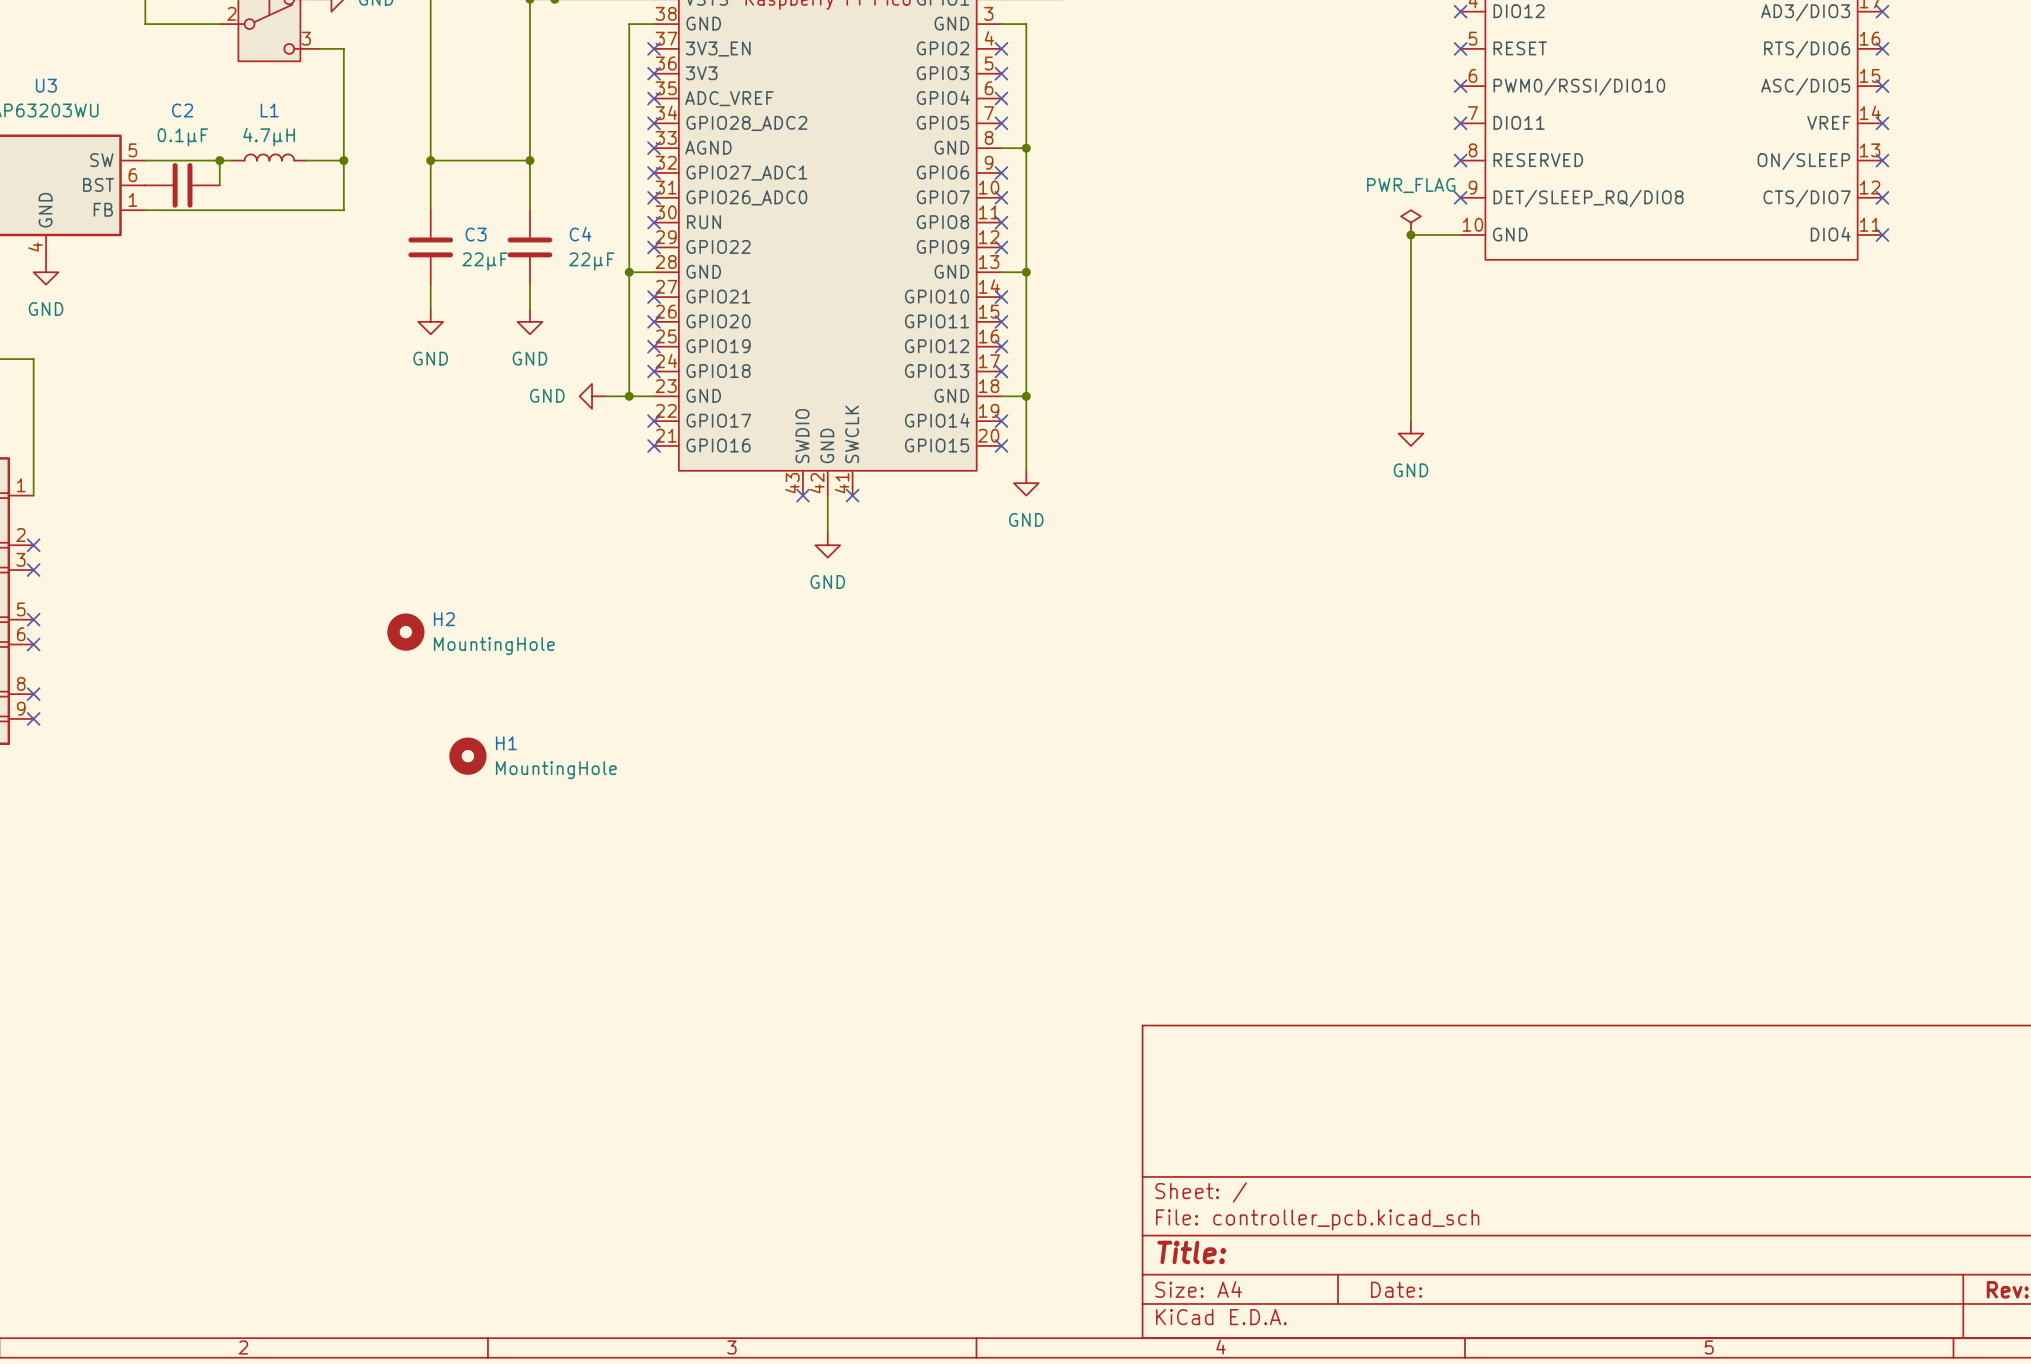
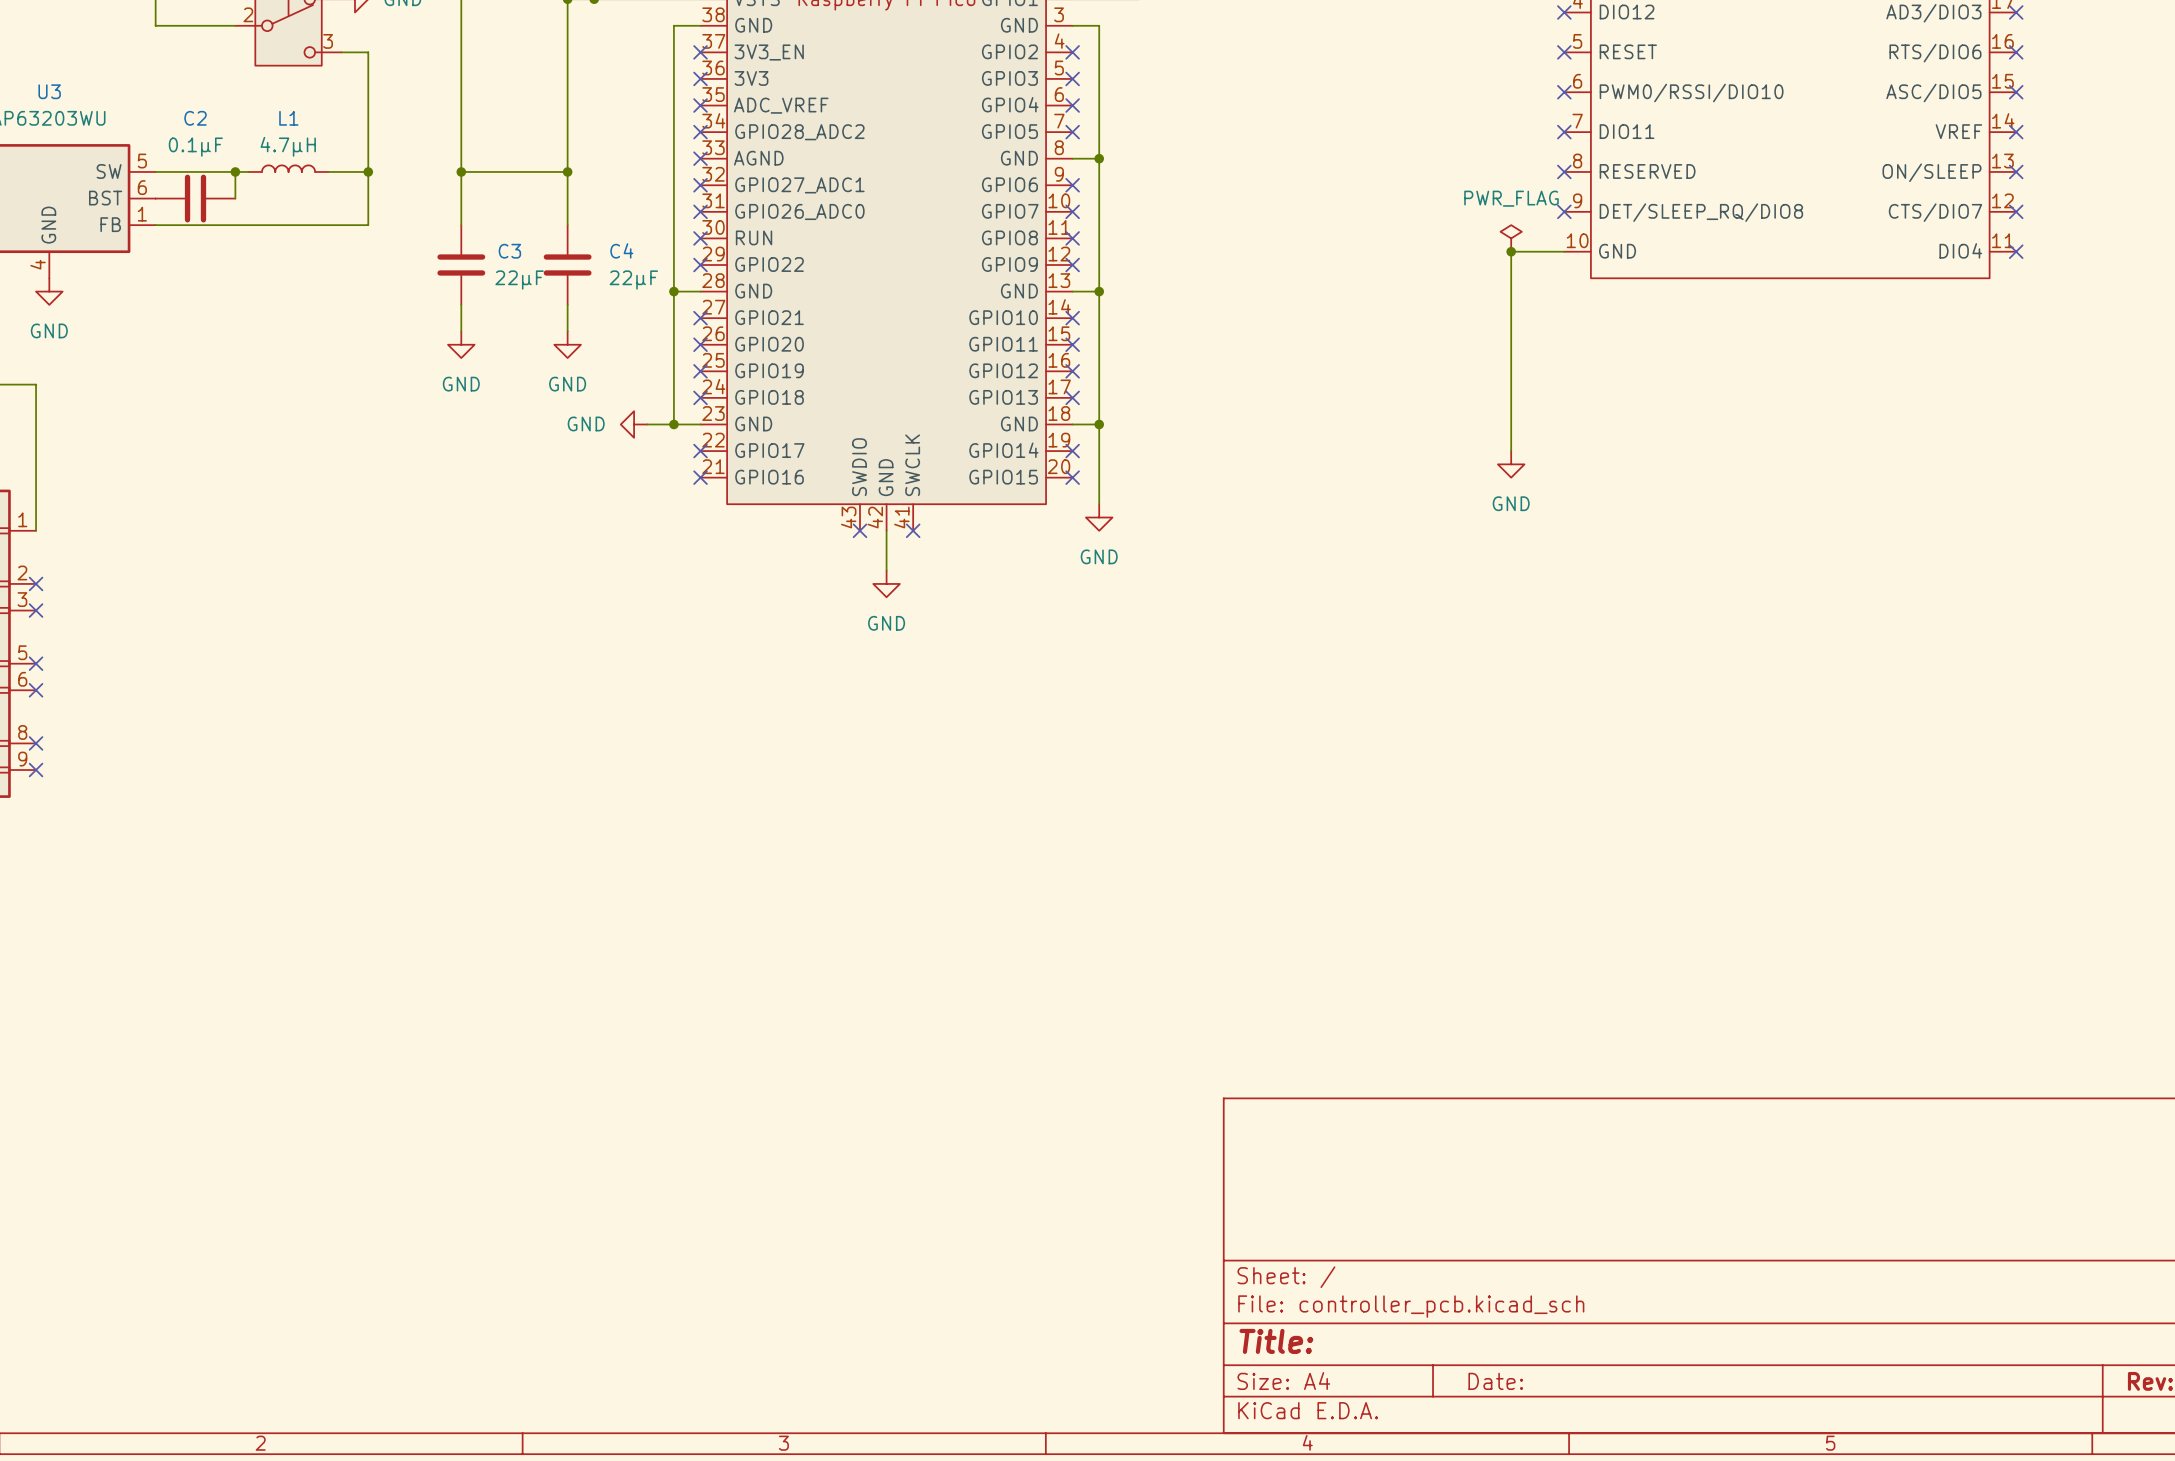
H2: MountingHole (405, 632) -> none
H1: MountingHole (467, 756) -> none

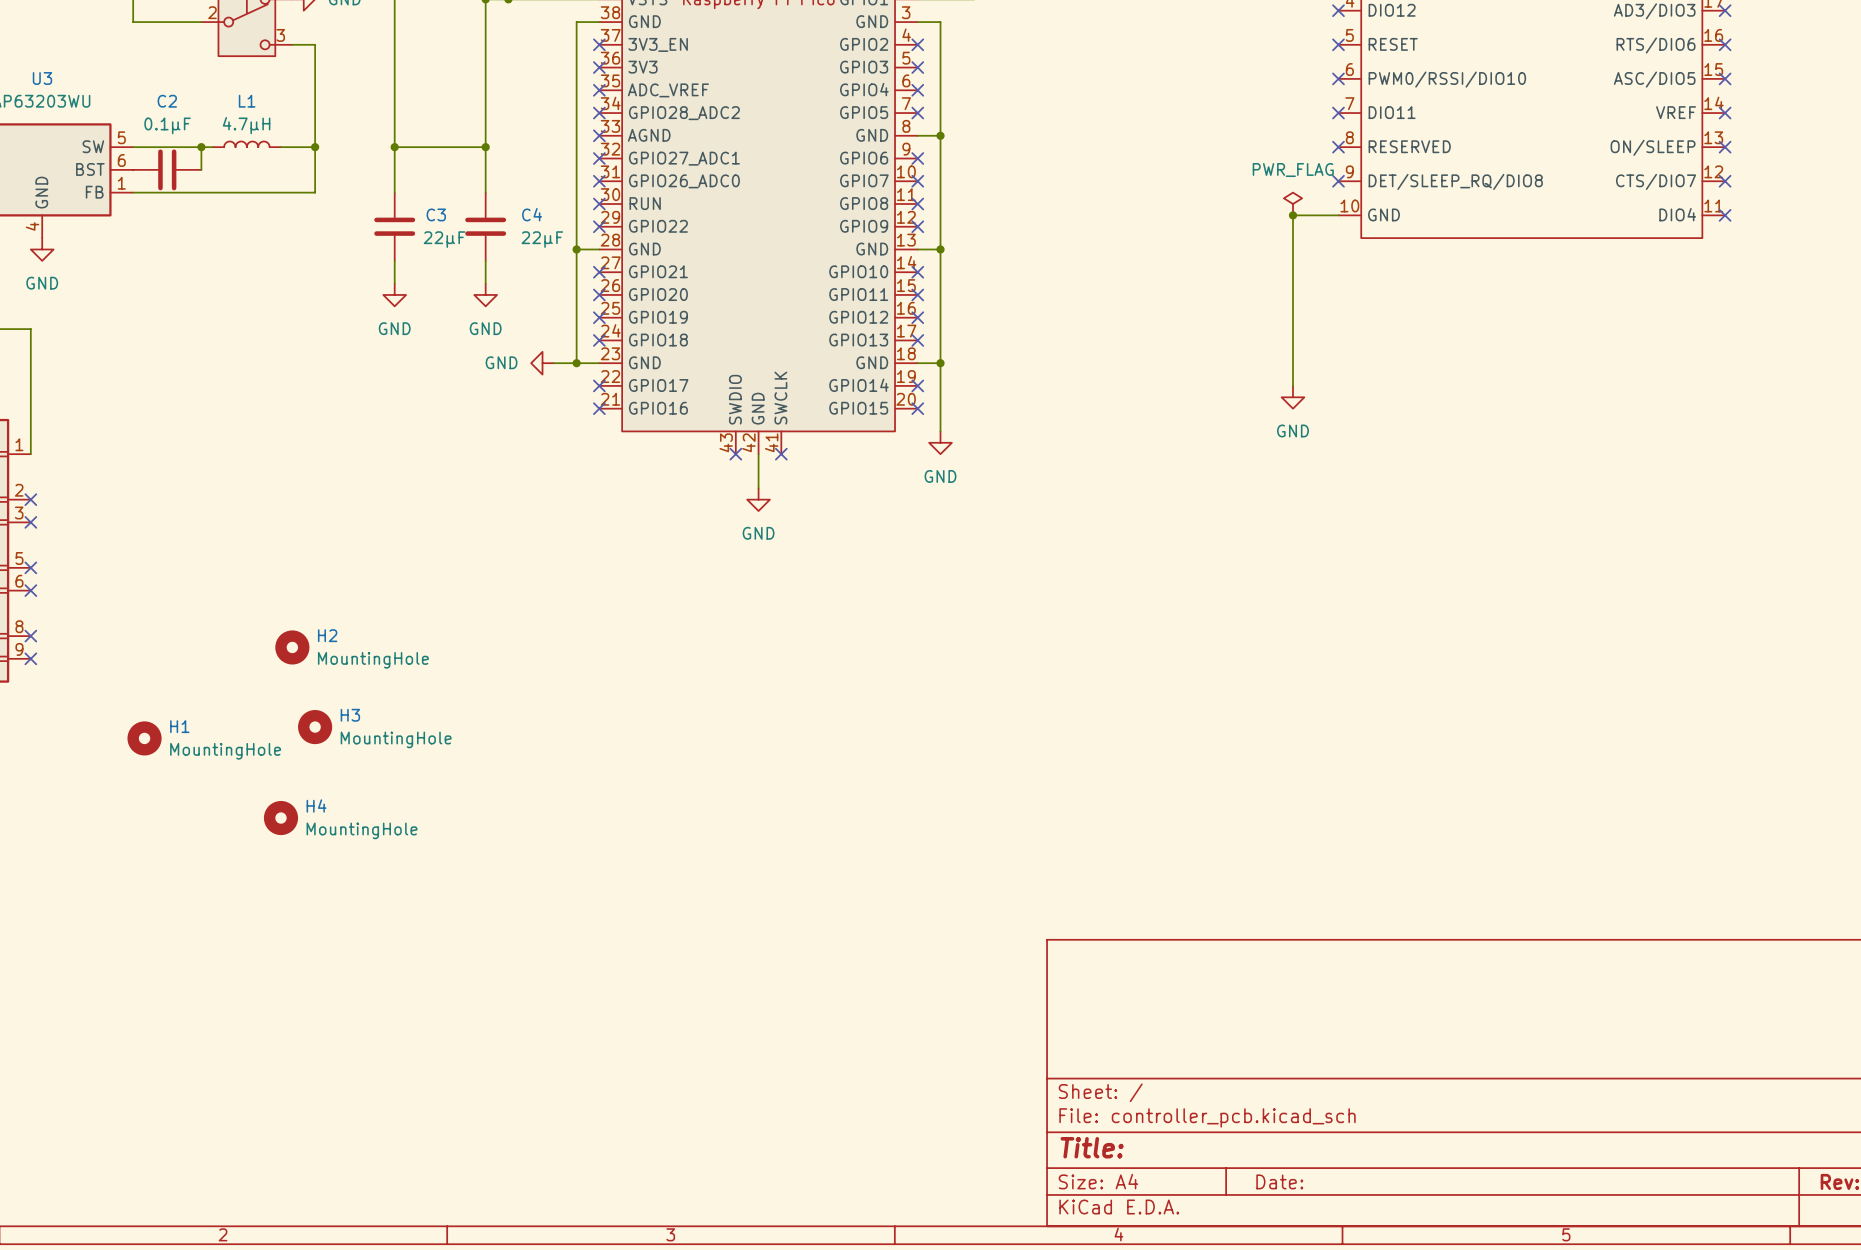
H2: none -> MountingHole (292, 647)
H3: none -> MountingHole (315, 727)
H1: none -> MountingHole (144, 738)
H4: none -> MountingHole (280, 818)

